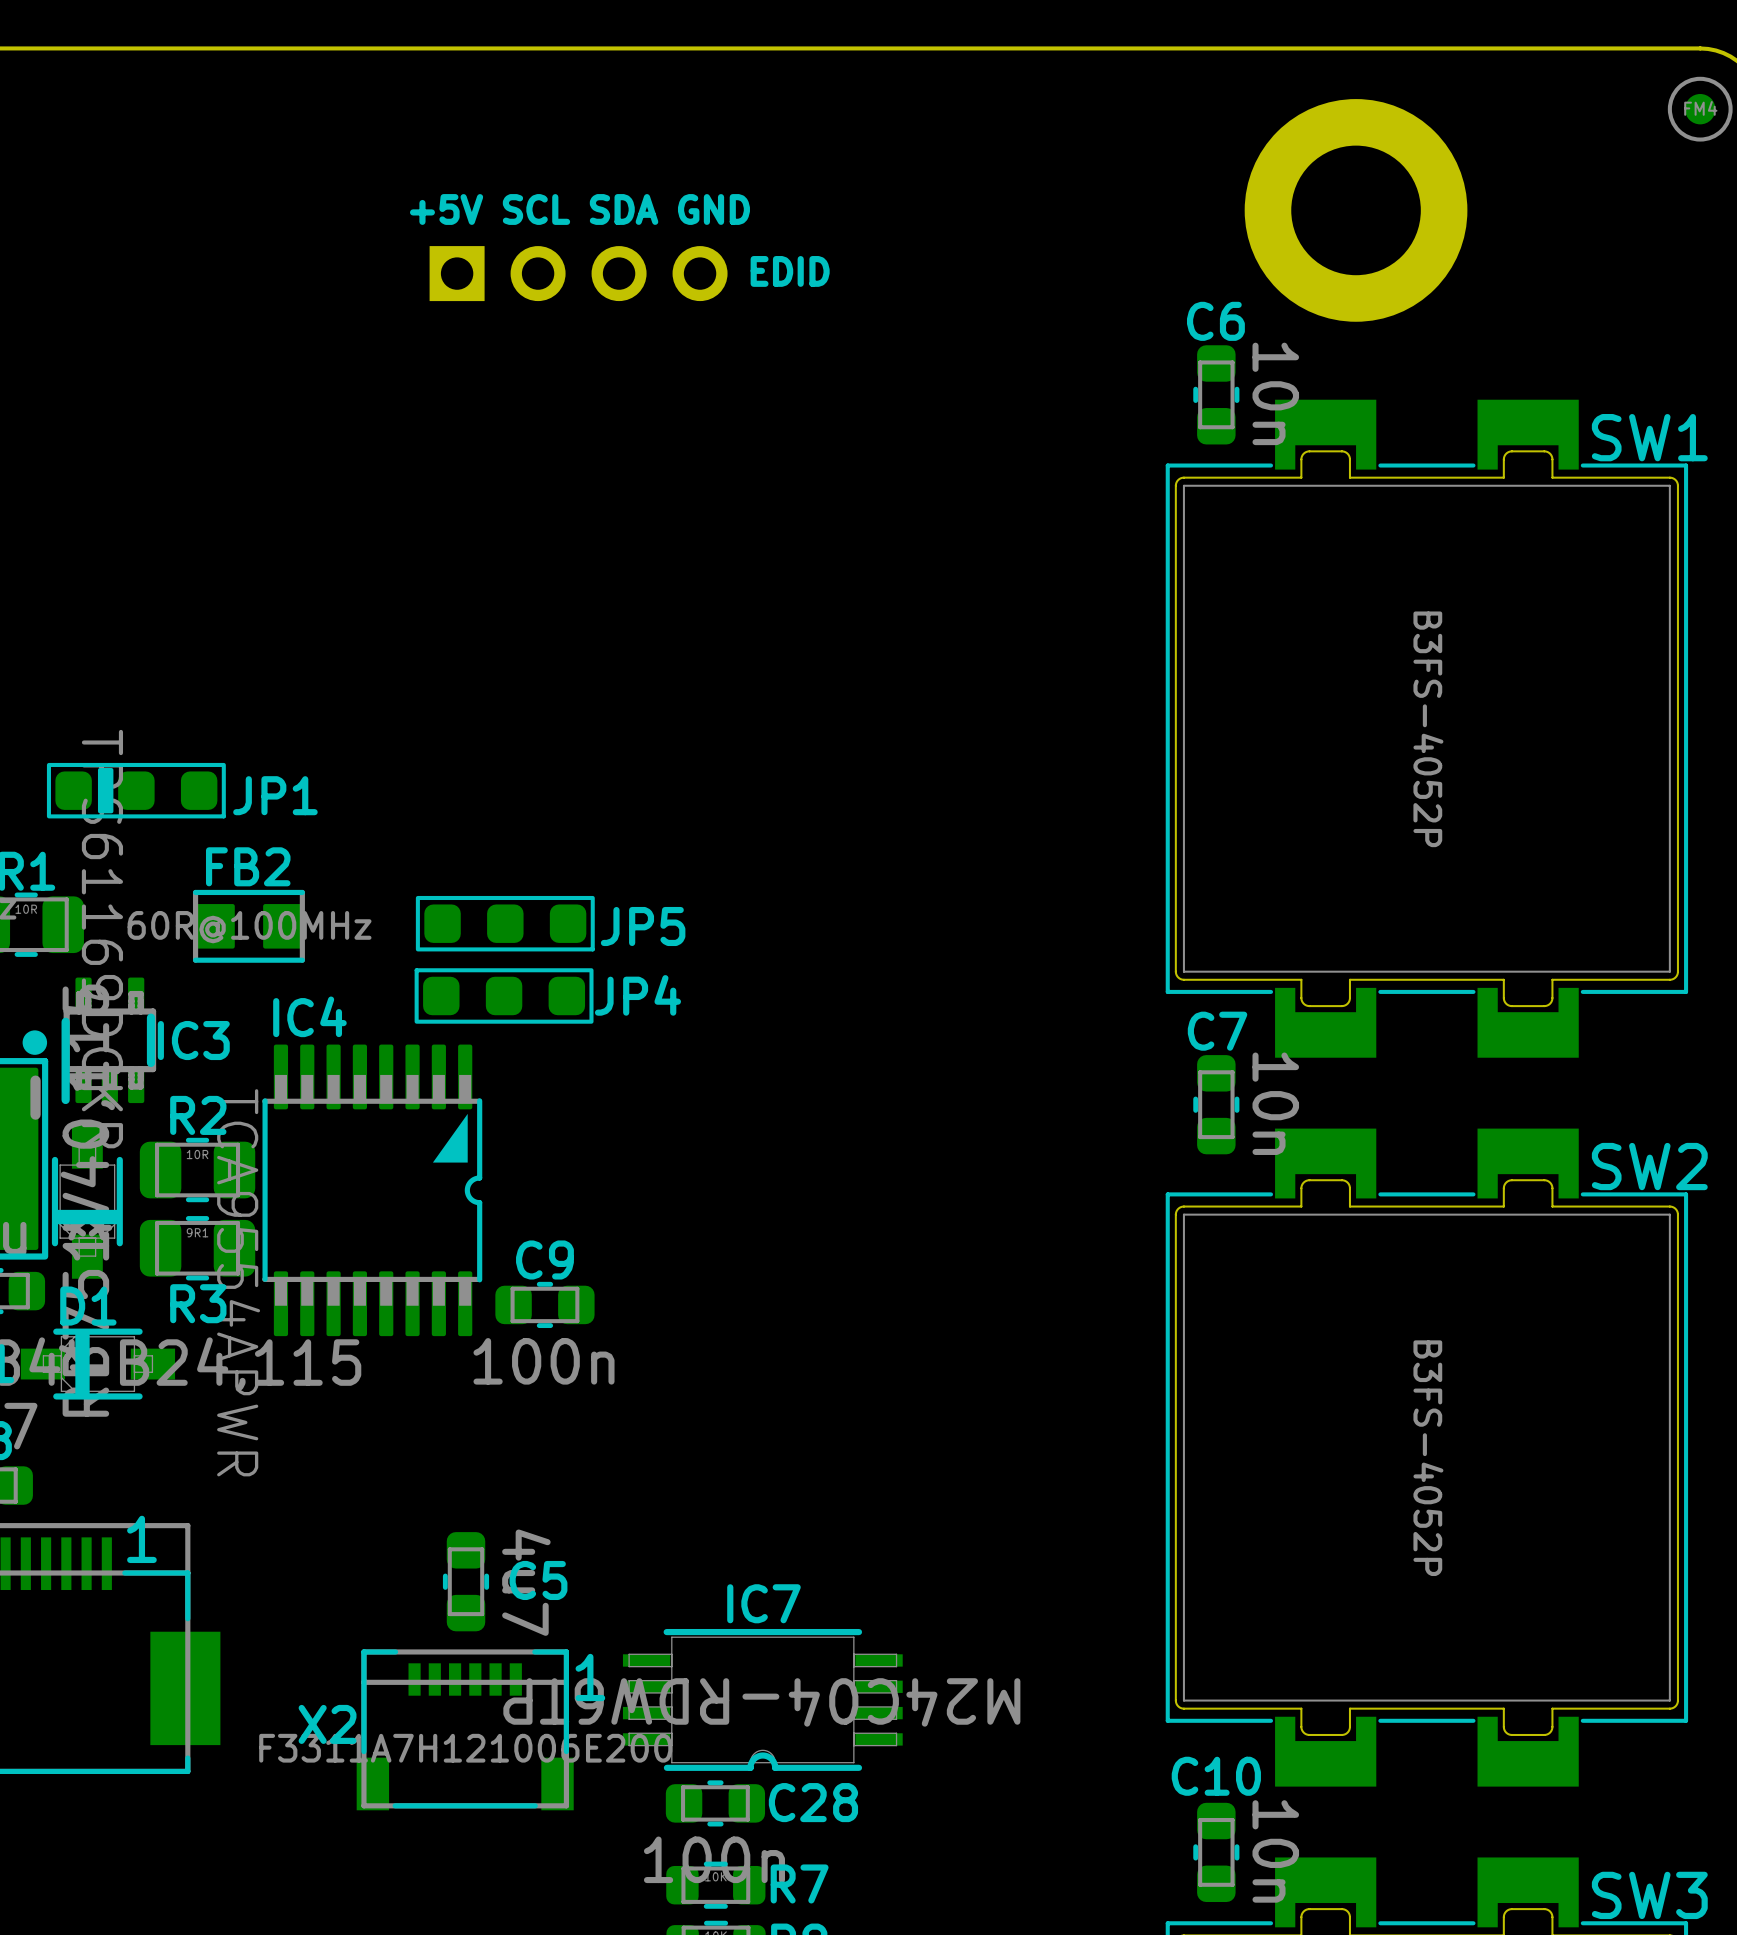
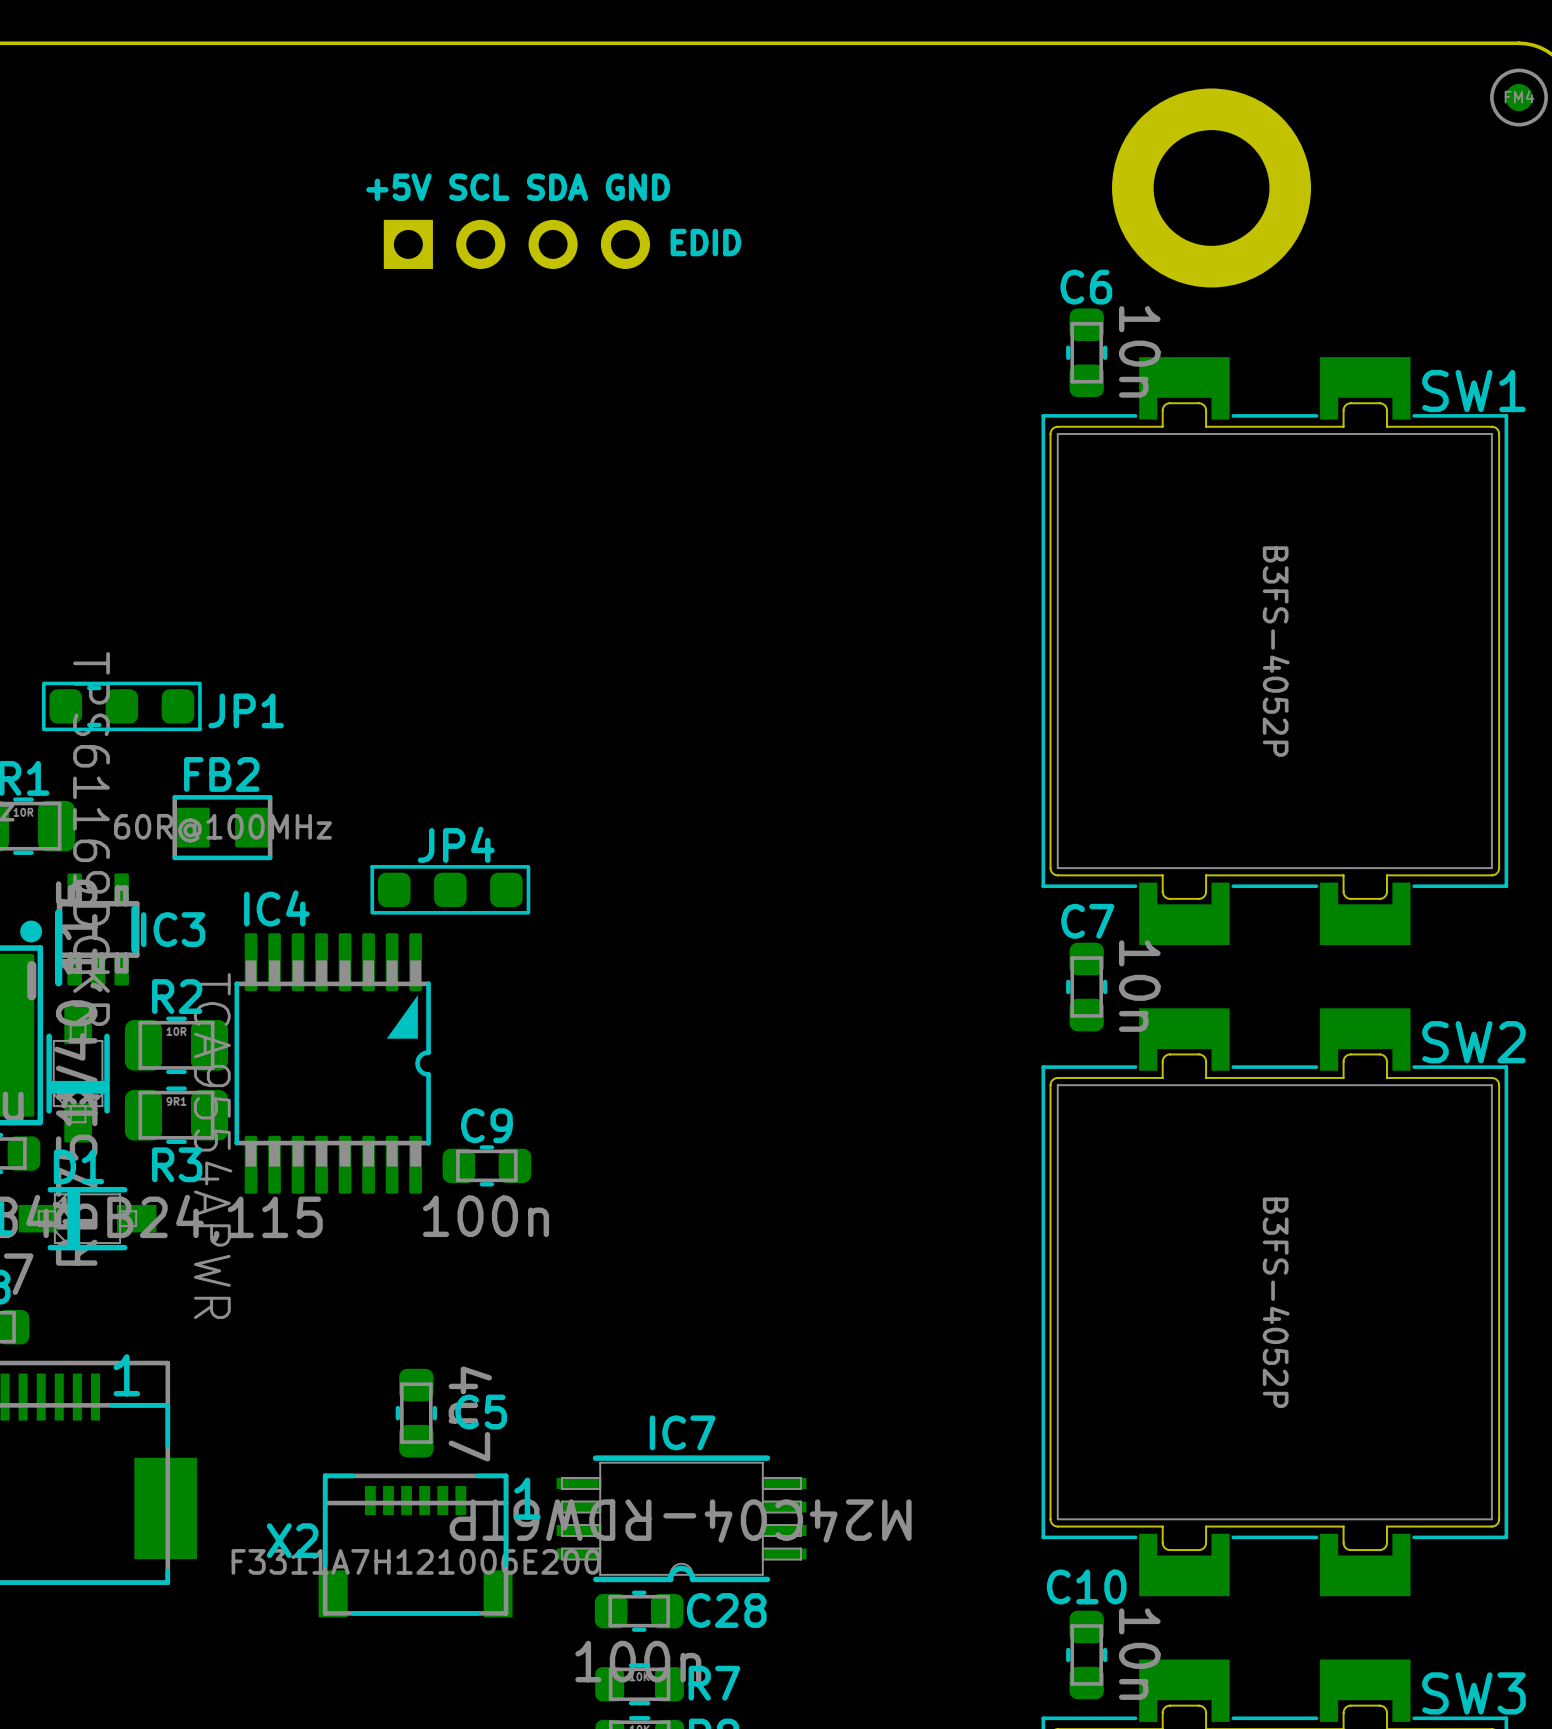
JP1 footprint: [46, 762, 226, 819] -> [41, 681, 202, 732]
JP5: (505, 923) -> none
JP4 name position: JP4 (637, 995) -> JP4 (456, 844)

